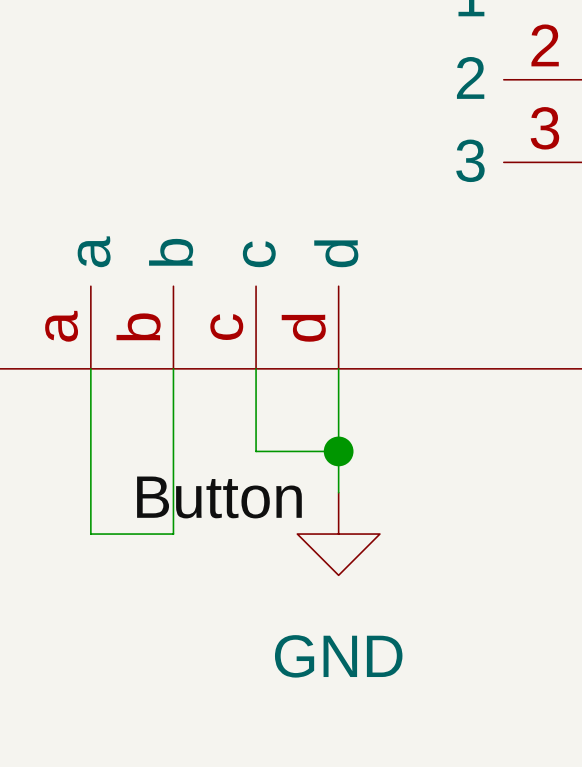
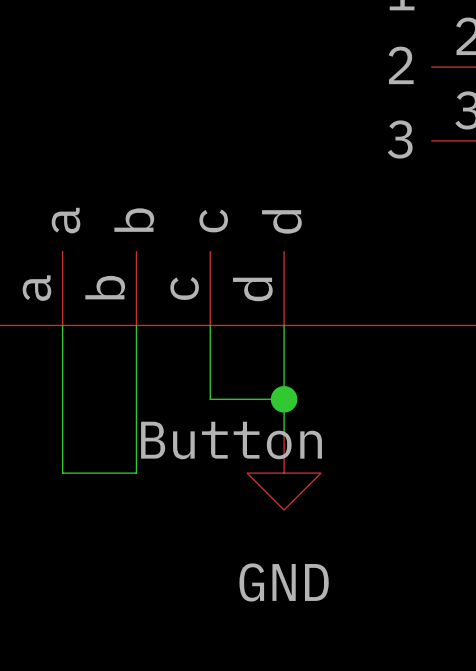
label position: Button (219, 497) -> Button (231, 440)

